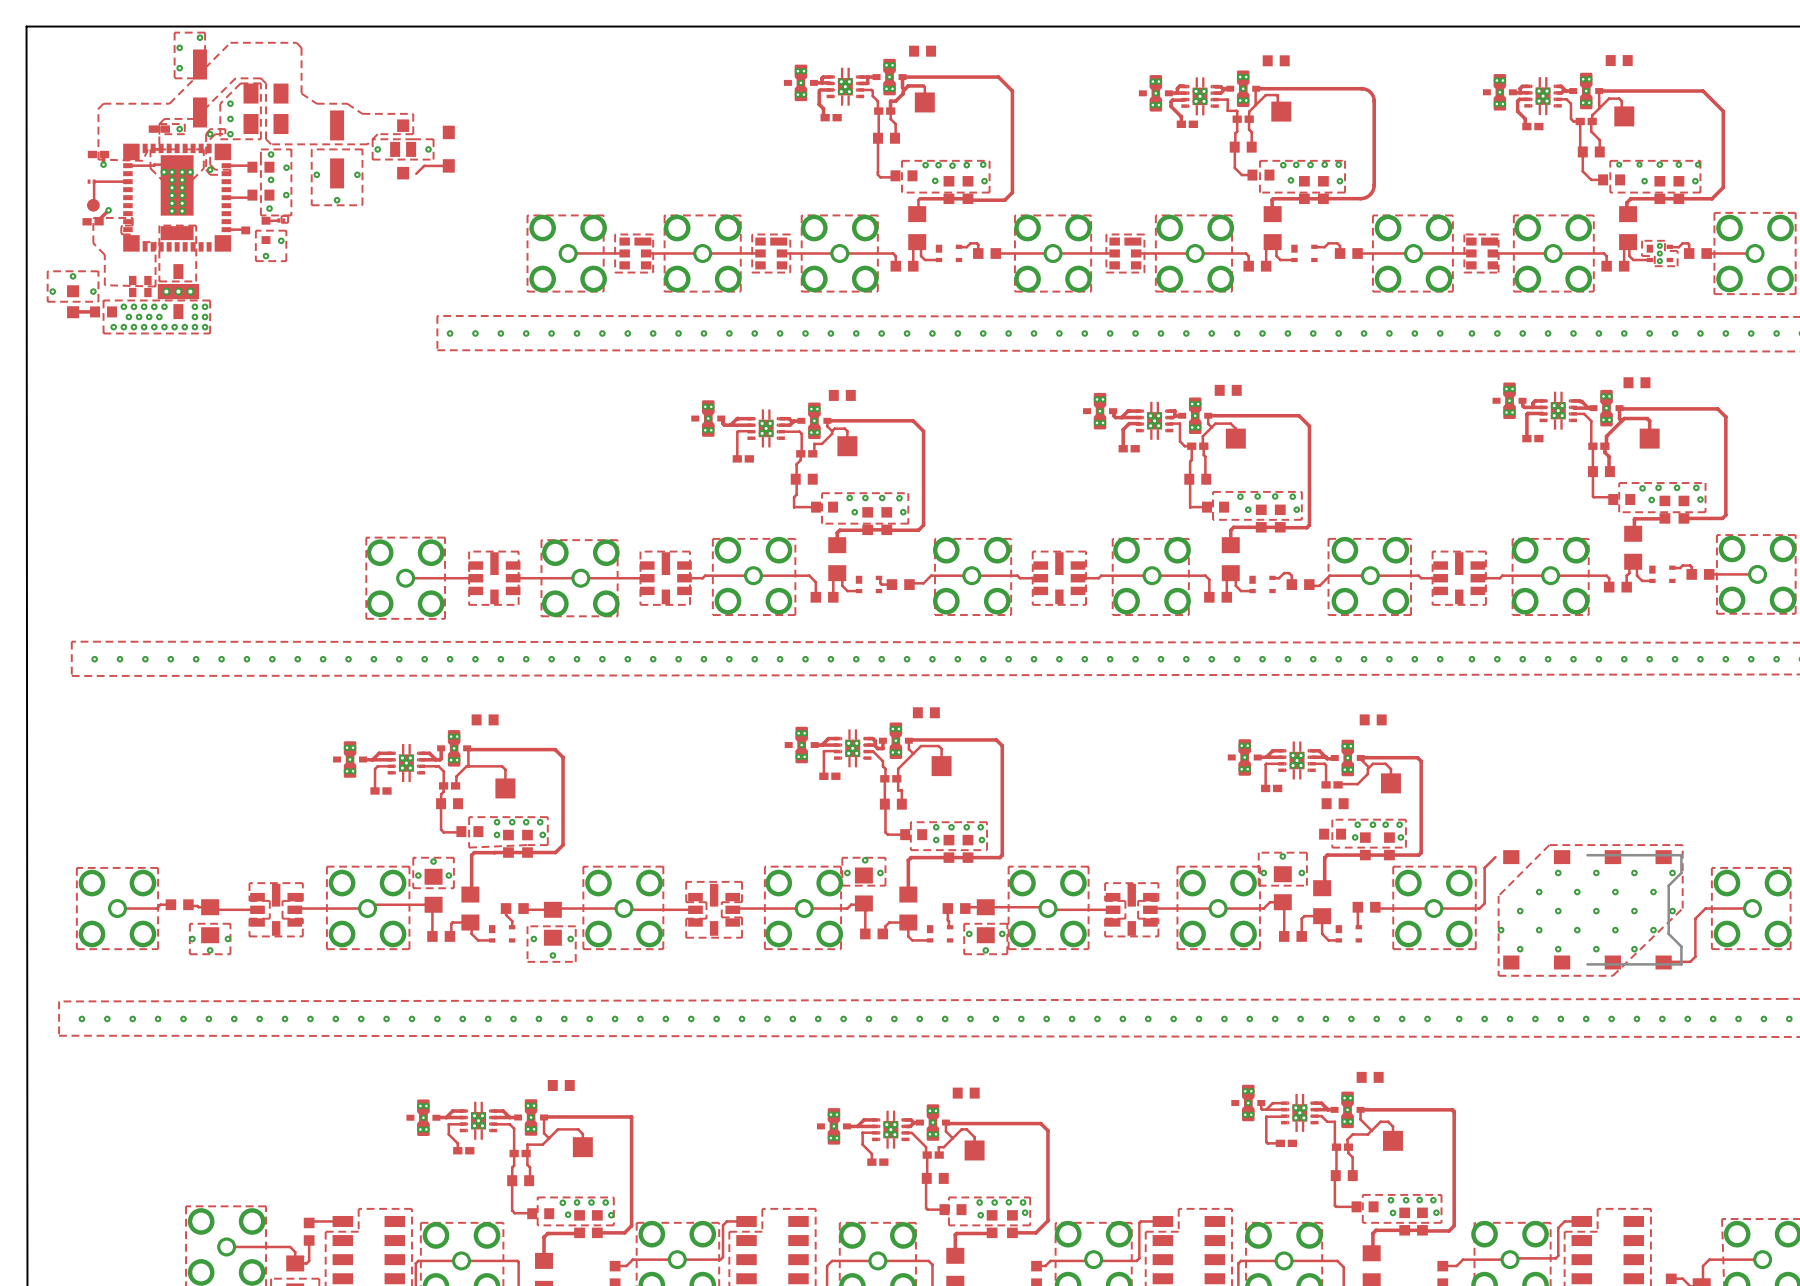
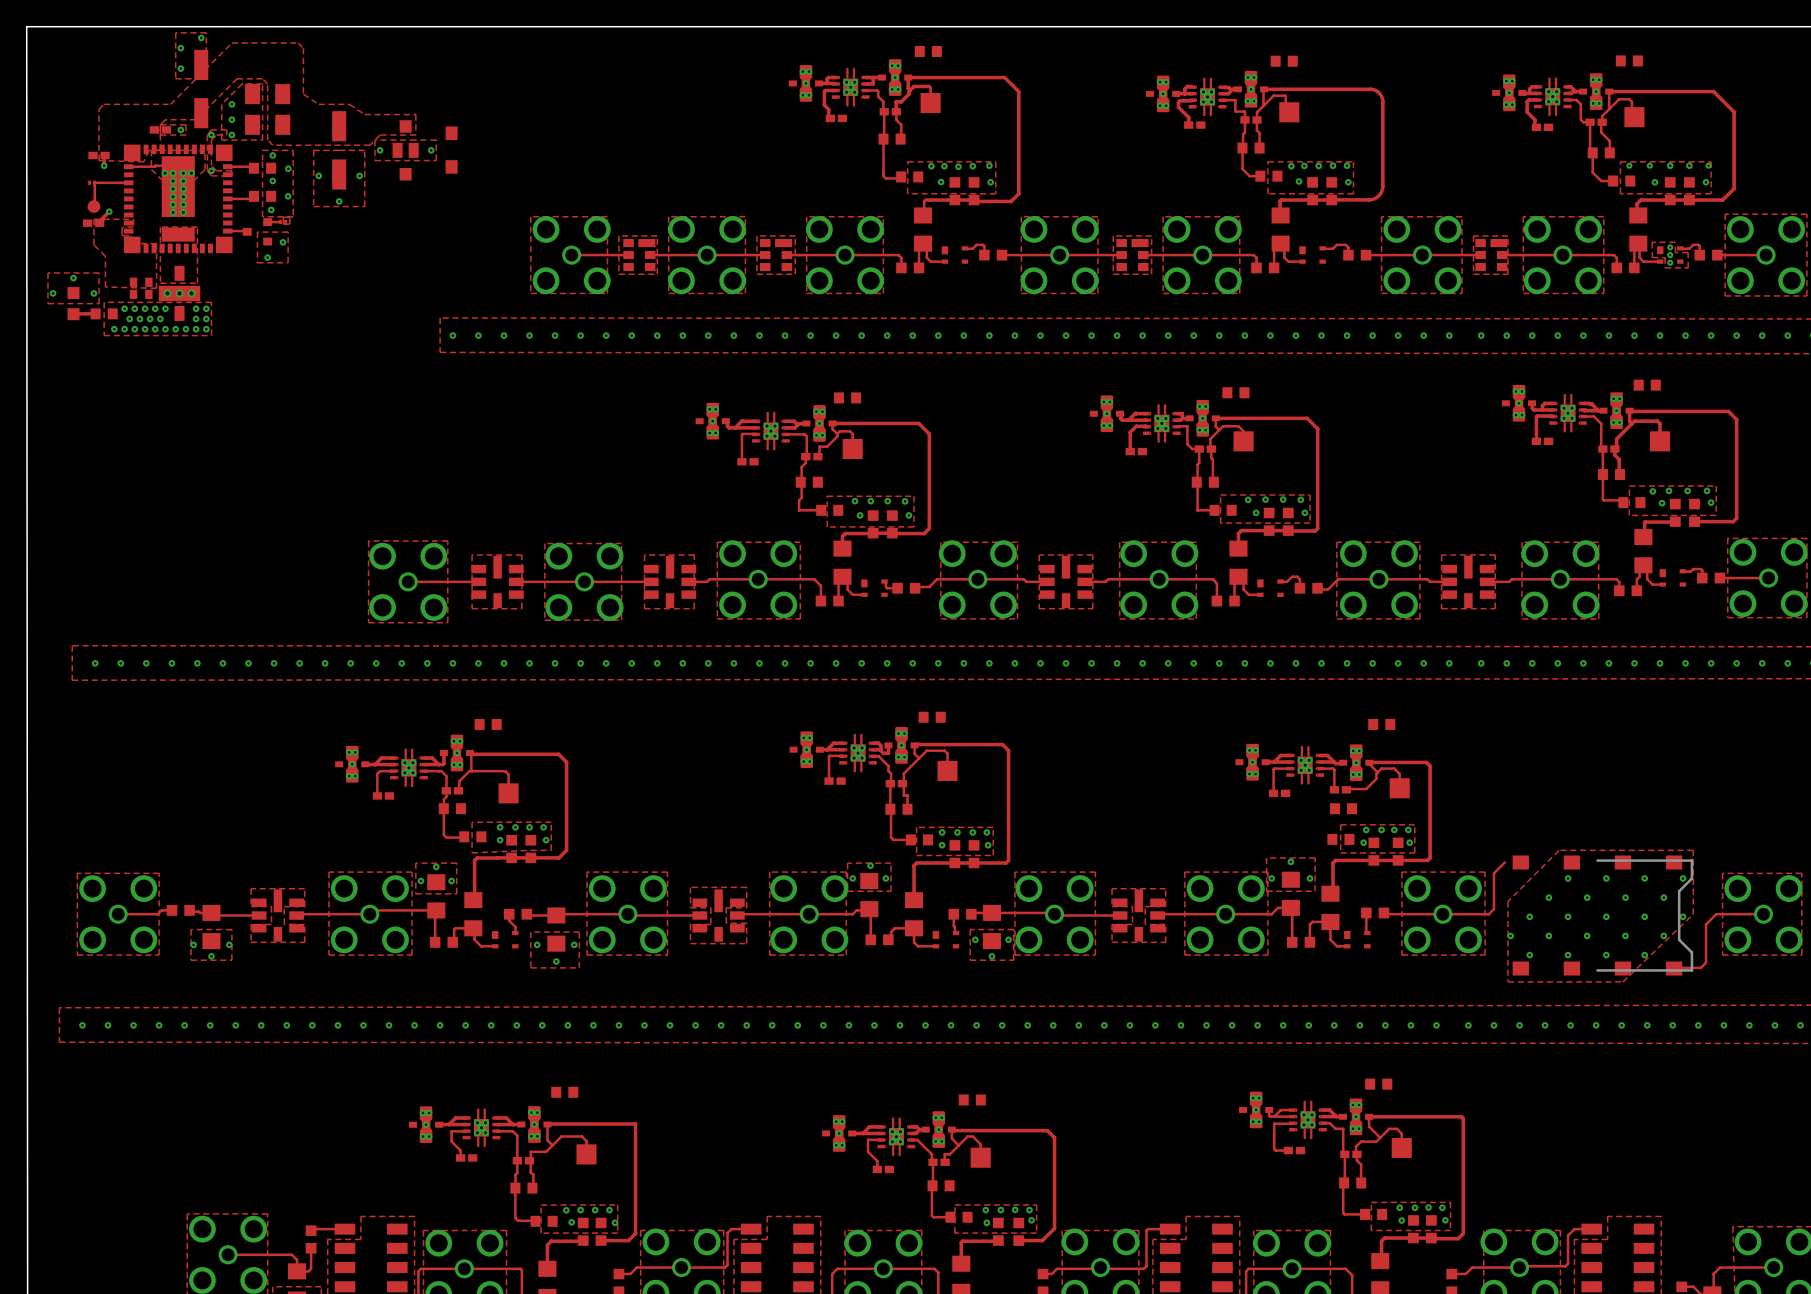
top track: (448, 165) (424, 165) (416, 173) -> none

